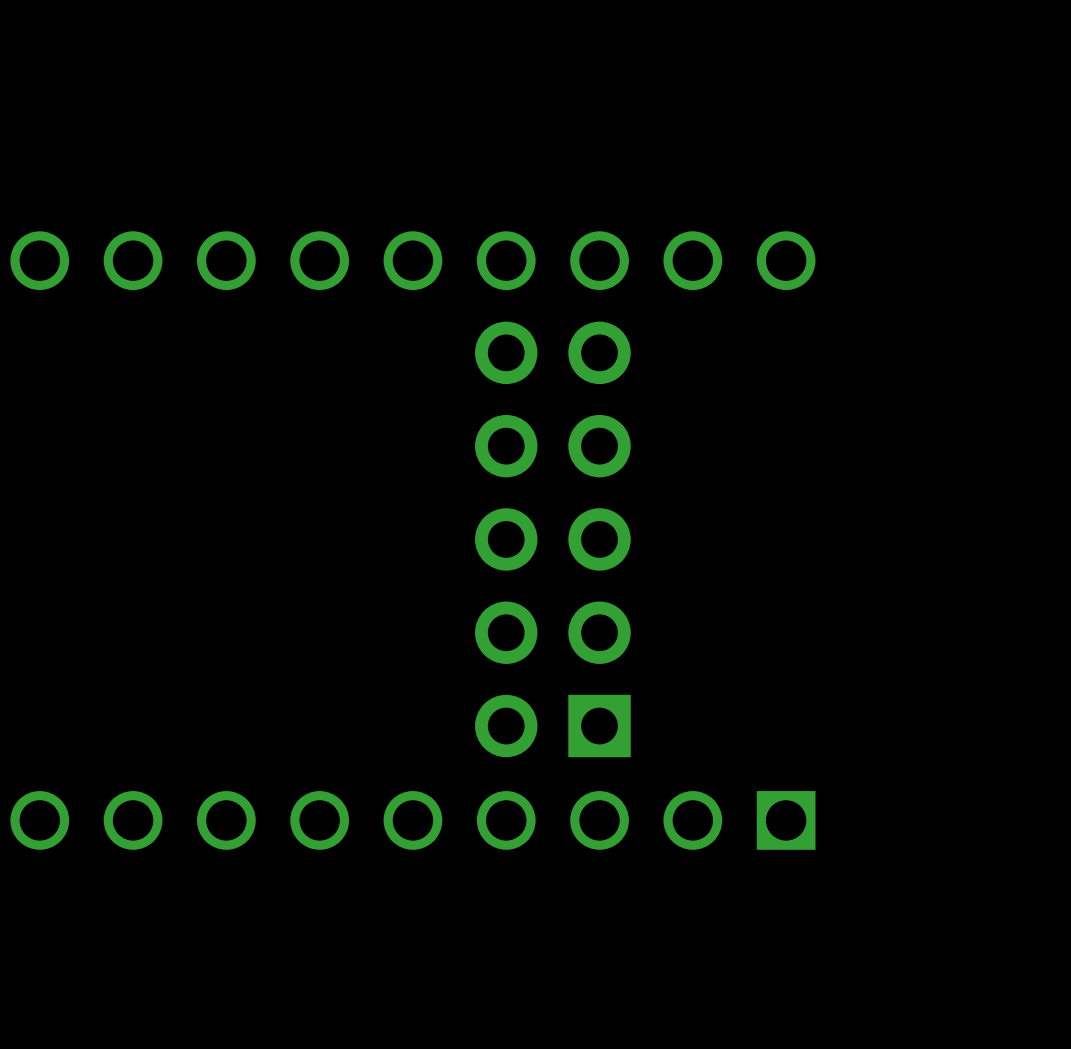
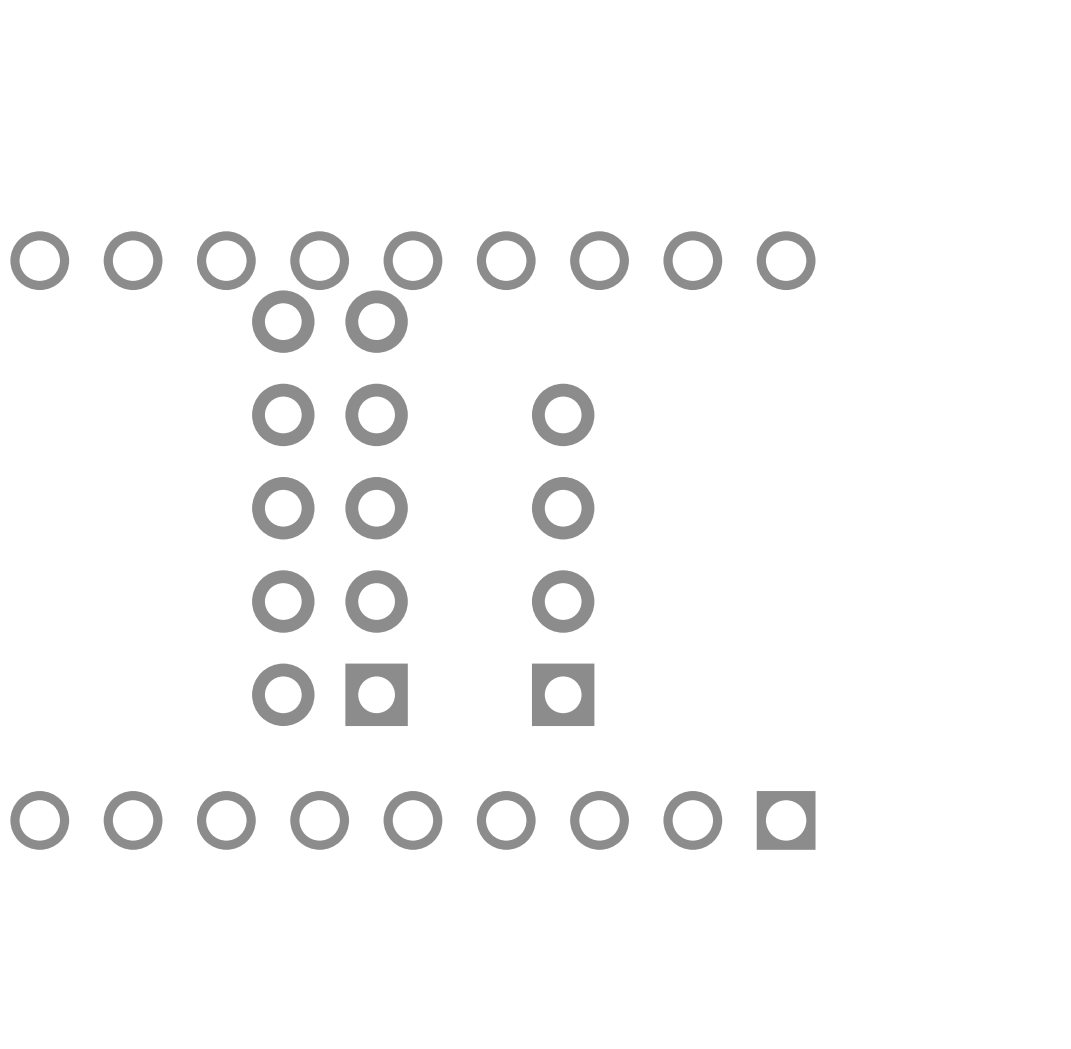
part footprint: [475, 321, 631, 758] -> [531, 383, 595, 727]
part: none -> (329, 508)

